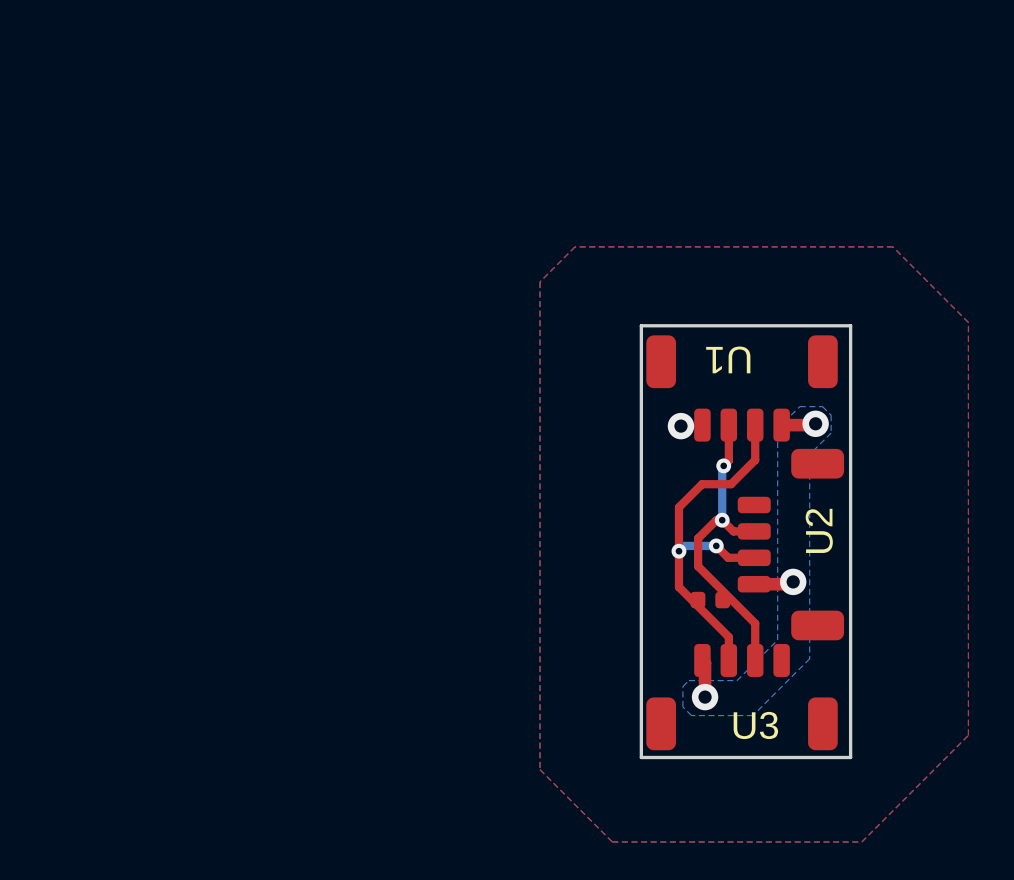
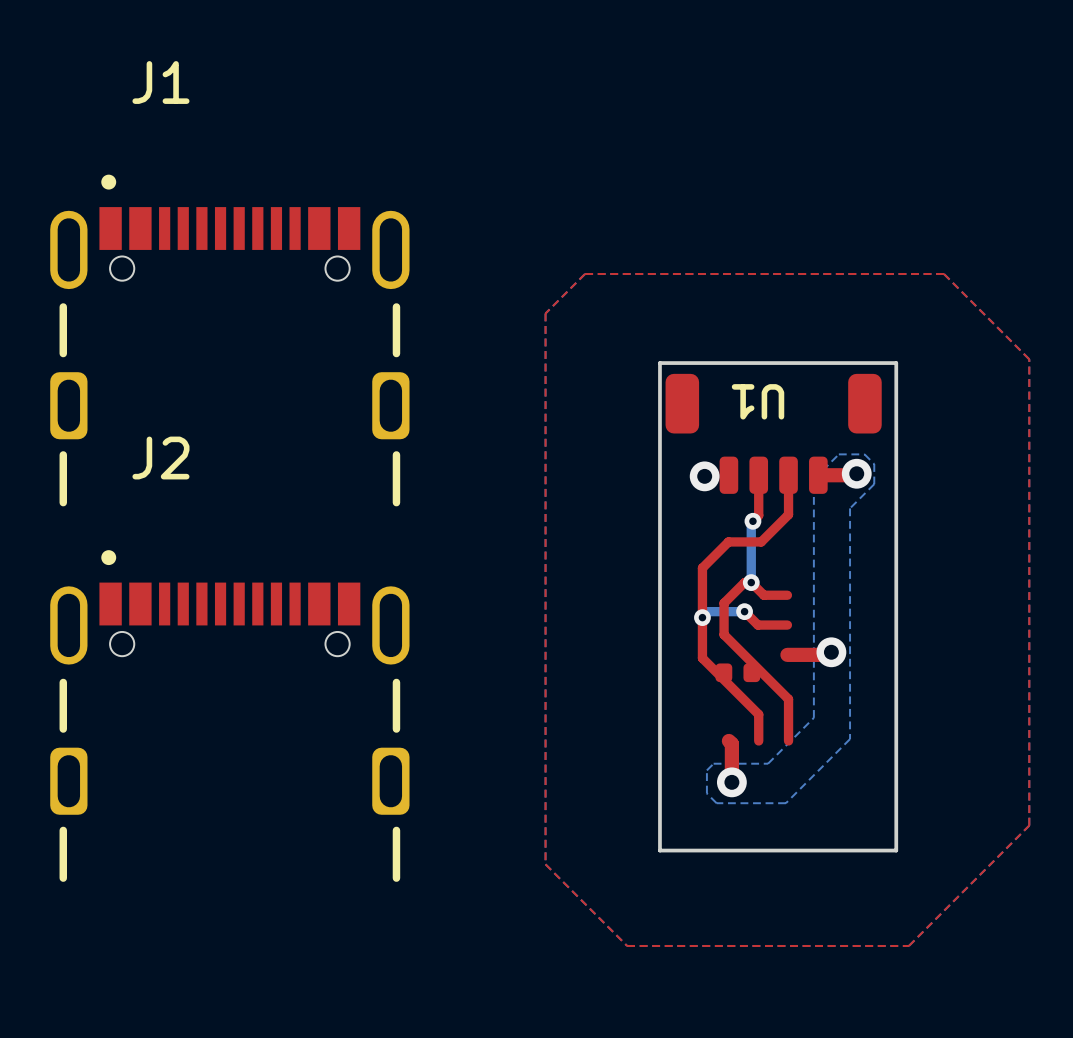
J1: none -> (229, 340)
U2: (790, 544) -> none
J2: none -> (229, 716)
U3: (742, 697) -> none

